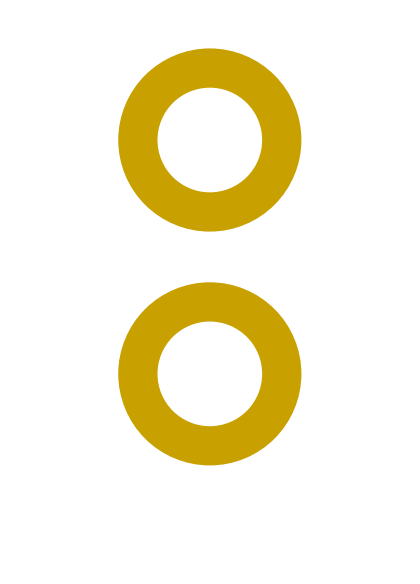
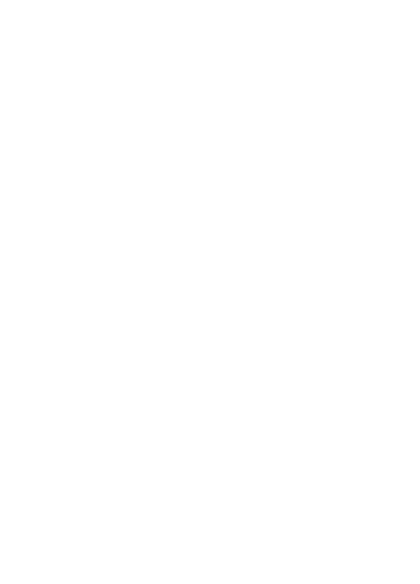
part: (209, 140) -> none
part: (209, 373) -> none

